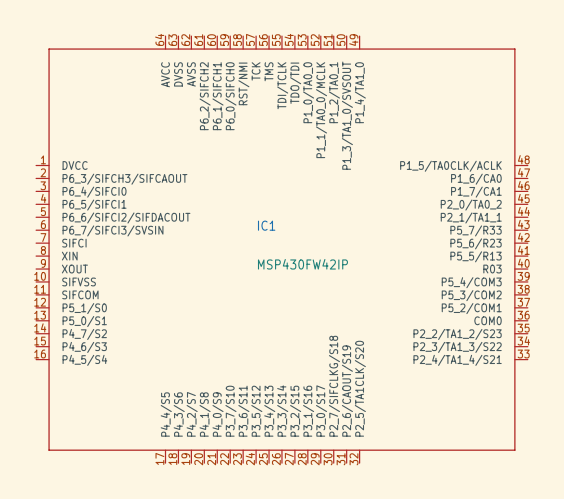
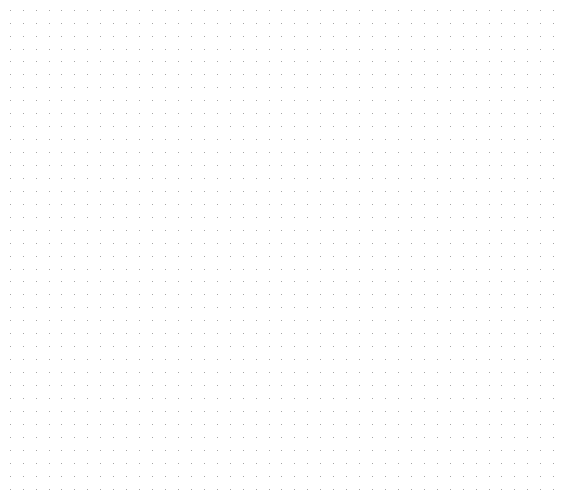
IC1: MSP430FW42IP (281, 249) -> none

